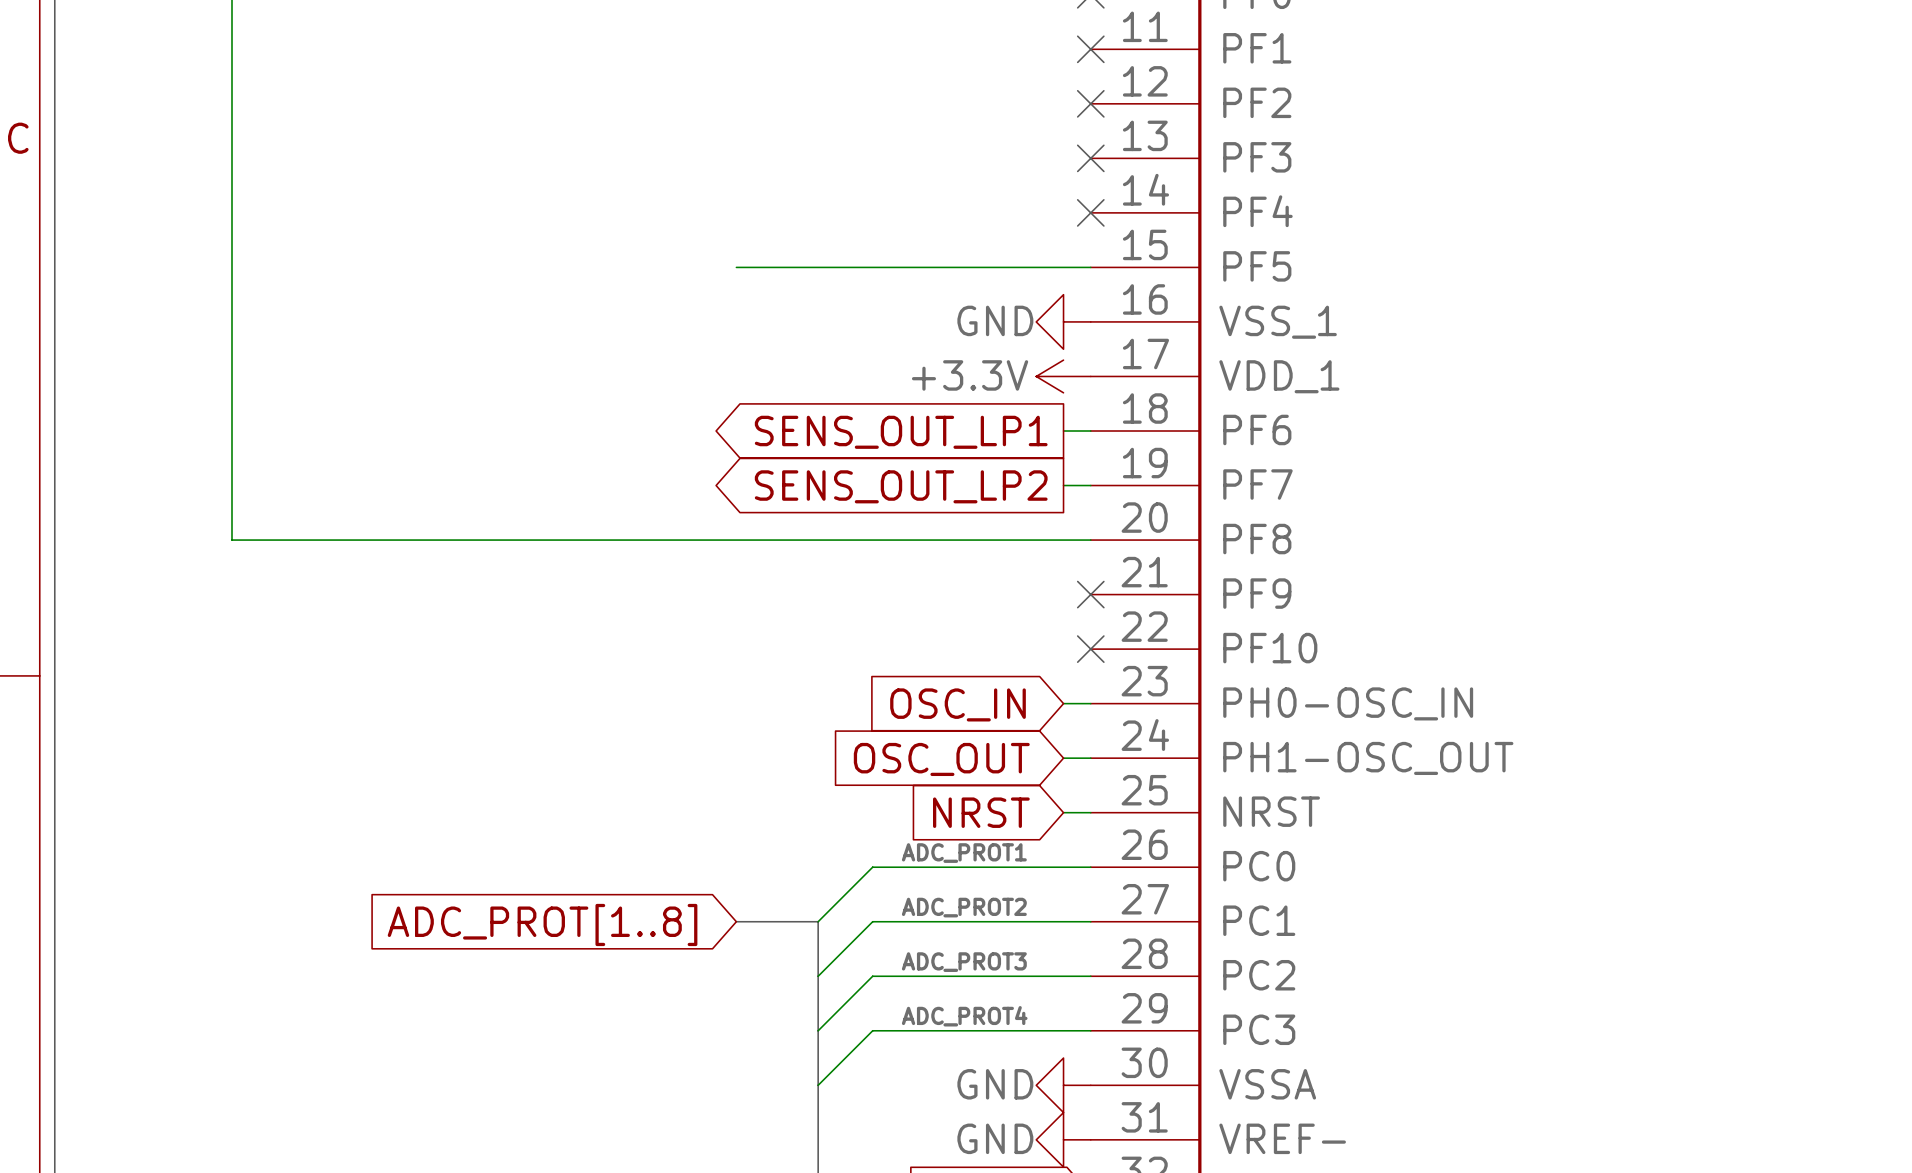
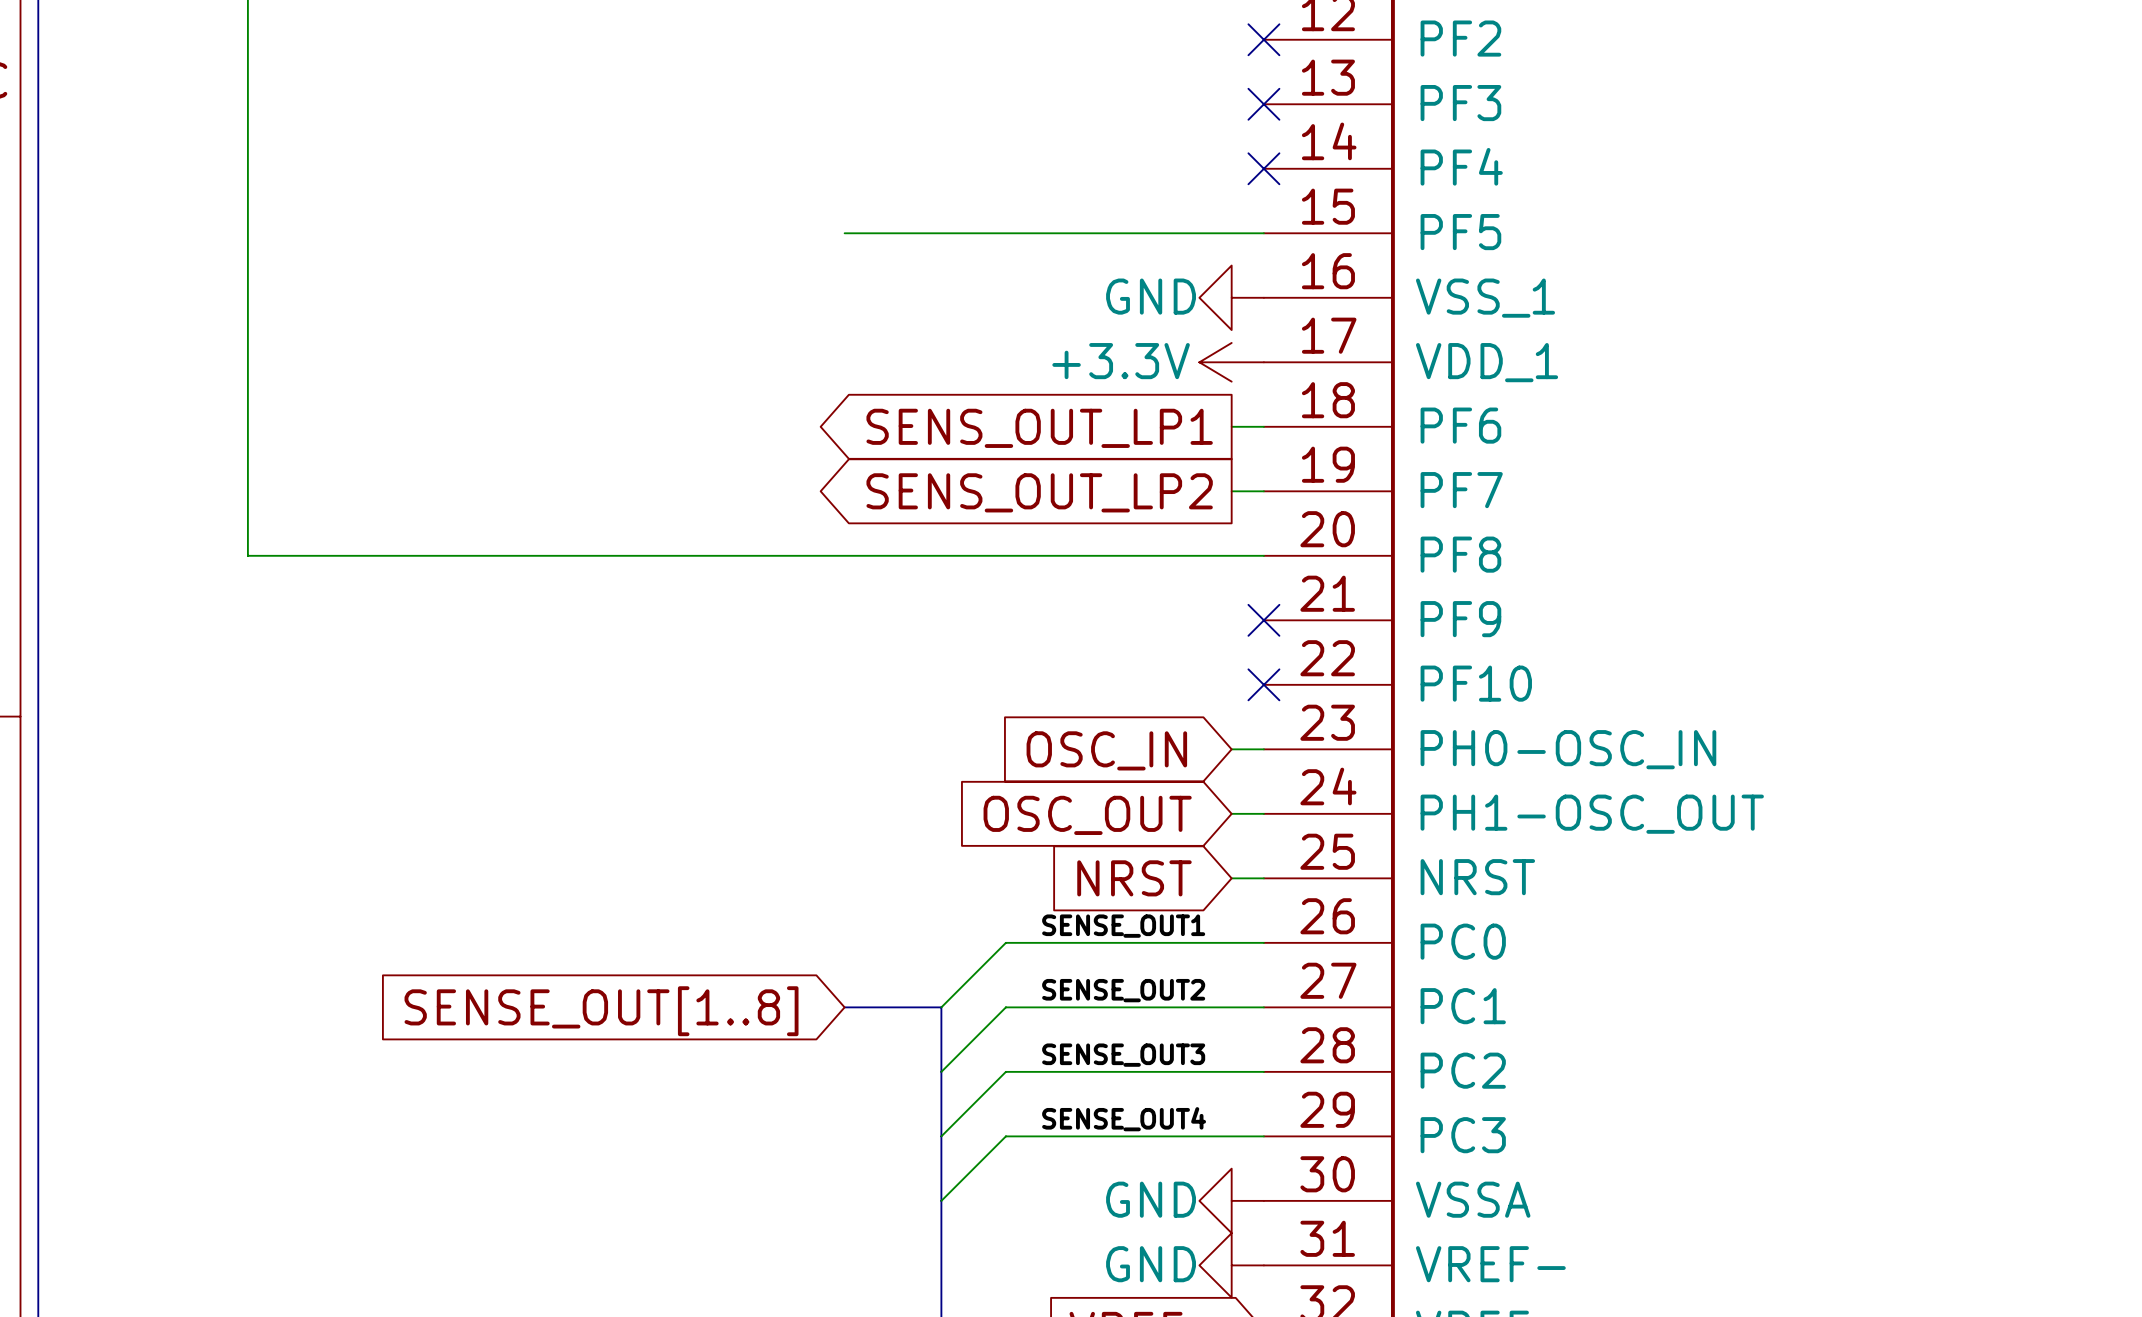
label: ADC_PROT1 (964, 853) -> SENSE_OUT1 (1123, 926)
label: ADC_PROT2 (964, 907) -> SENSE_OUT2 (1123, 990)
global label: ADC_PROT[1..8] (542, 924) -> SENSE_OUT[1..8] (601, 1011)
label: ADC_PROT3 (964, 962) -> SENSE_OUT3 (1123, 1055)
label: ADC_PROT4 (964, 1016) -> SENSE_OUT4 (1124, 1119)

